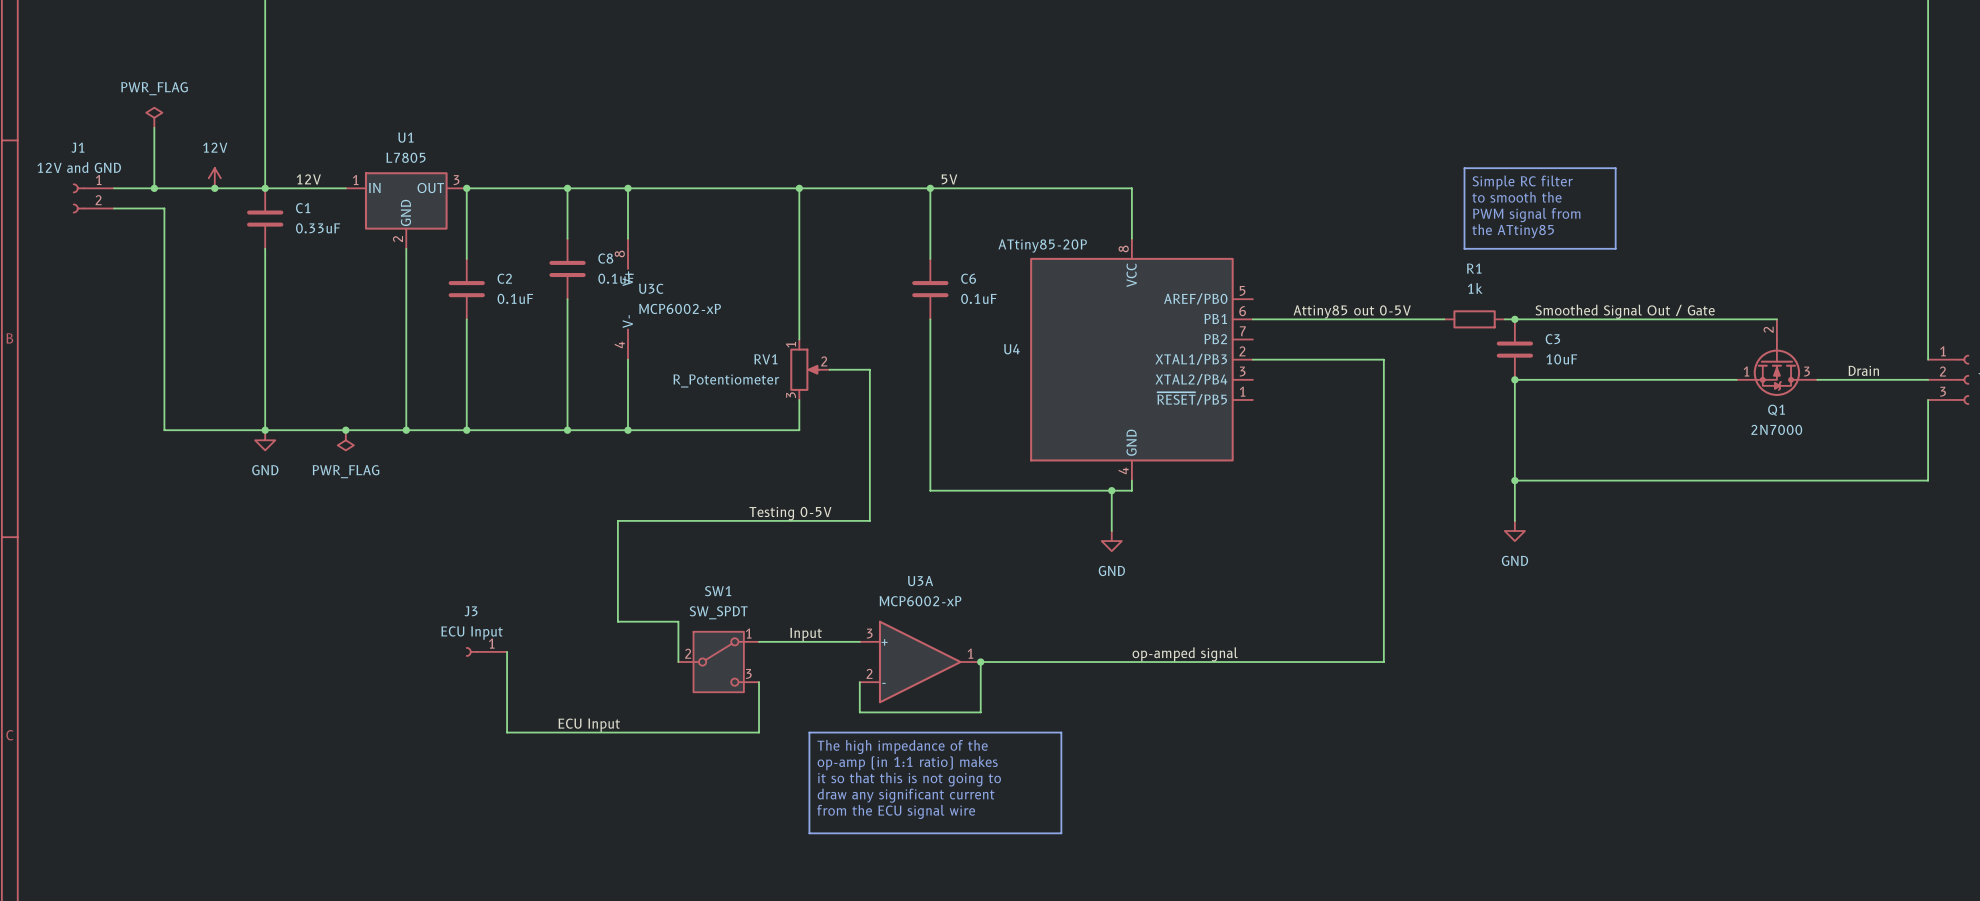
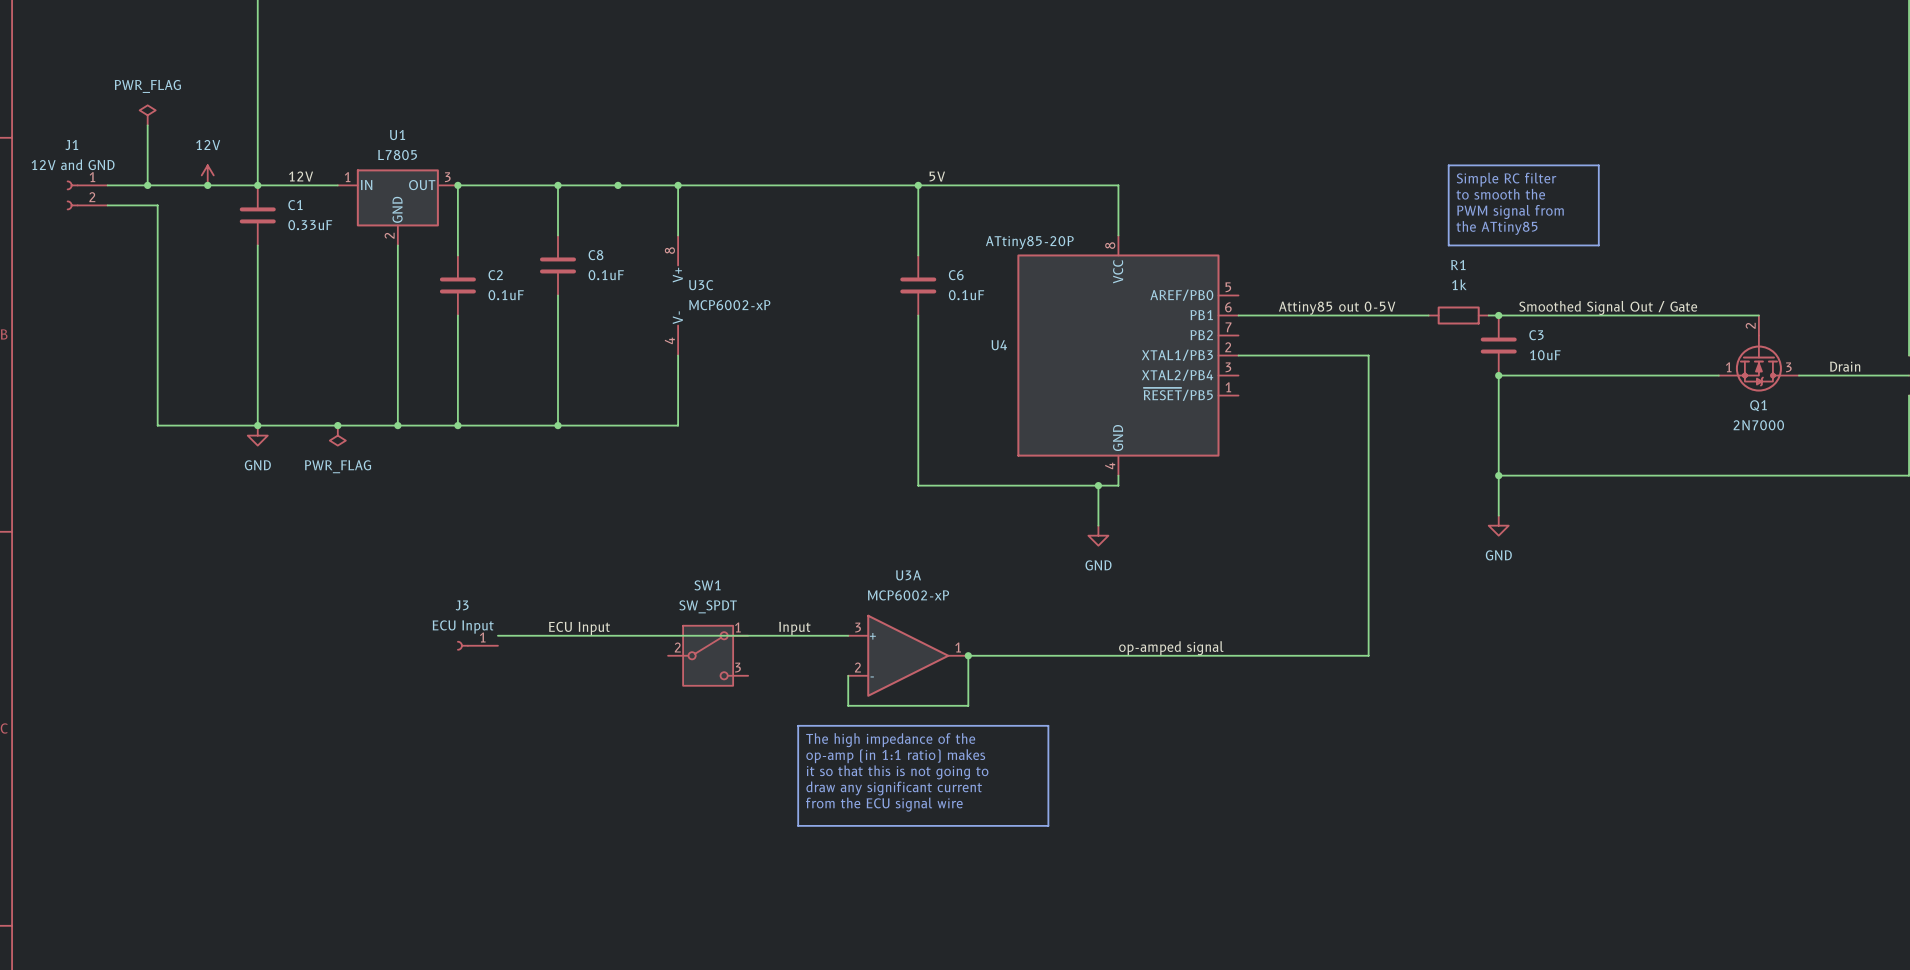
wire: (628, 188) (628, 238) -> (678, 185) (678, 235)
junction: none -> (678, 185)
wire: (799, 188) (799, 339) -> none
junction: (799, 188) -> none
U3C position: (628, 299) -> (678, 295)
wire: (628, 359) (628, 430) -> none
RV1: R_Potentiometer (809, 369) -> none
wire: (829, 369) (869, 369) (869, 520) (617, 520) (617, 621) (678, 621) (678, 662) -> none
wire: (799, 399) (799, 430) (688, 430) -> (678, 355) (678, 425)
junction: (628, 430) -> none
label: Testing 0-5V (790, 513) -> none
wire: none -> (497, 635) (748, 635)
wire: (507, 651) (507, 732) (759, 732) (759, 682) -> none
label position: ECU Input (589, 725) -> ECU Input (579, 628)

